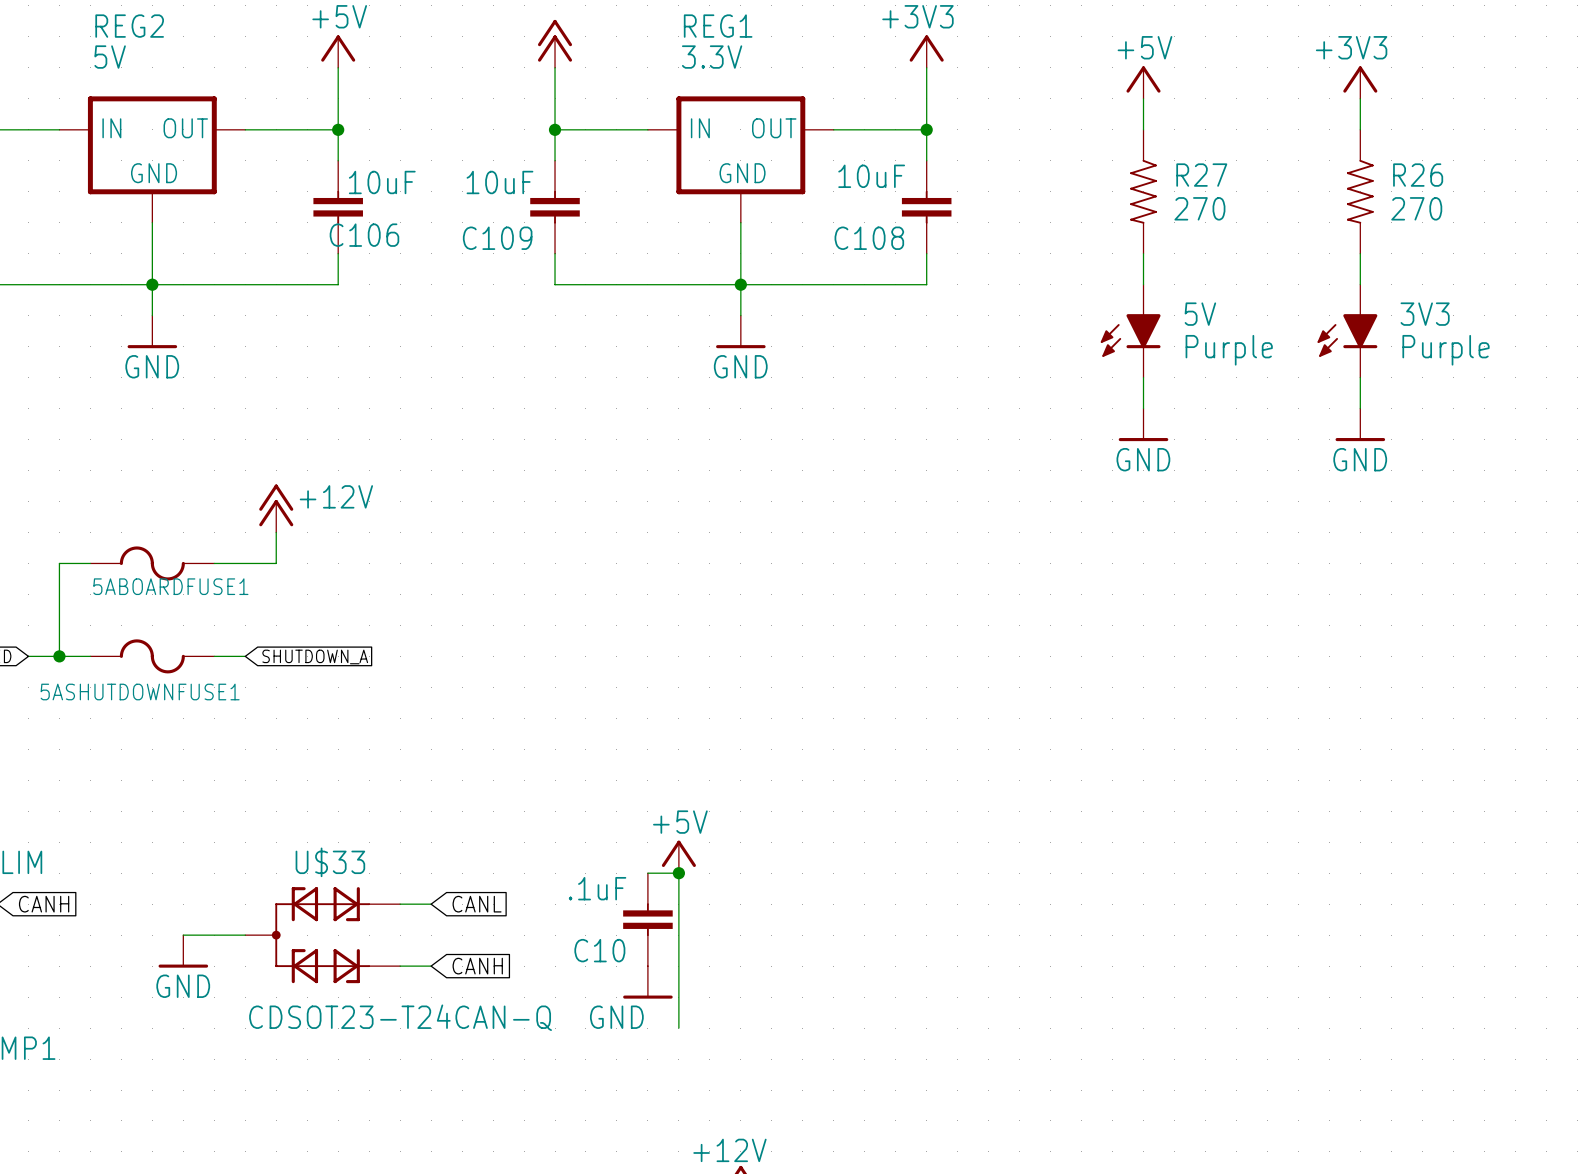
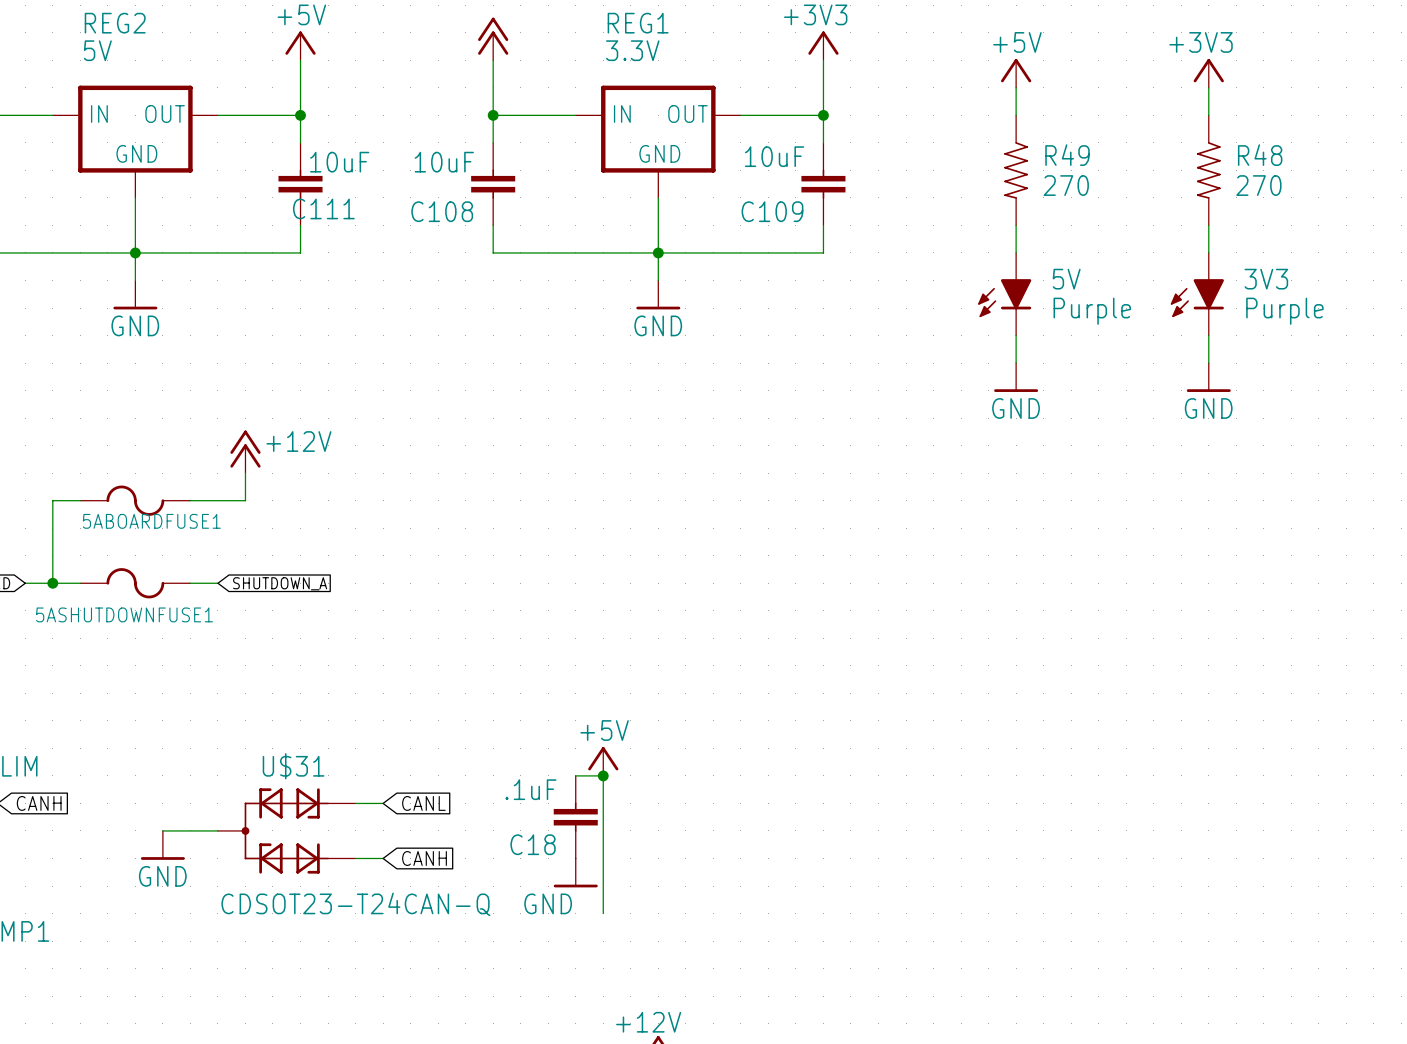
R27 name: R27 (1201, 175) -> R49 (1067, 155)
R26 name: R26 (1418, 175) -> R48 (1260, 155)
C106 name: C106 (364, 235) -> C111 (323, 208)
C109 name: C109 (497, 238) -> C108 (442, 211)
C108 name: C108 (869, 238) -> C109 (772, 211)
U$33 name: U$33 (330, 862) -> U$31 (293, 766)
C10 name: C10 (599, 950) -> C18 (533, 844)

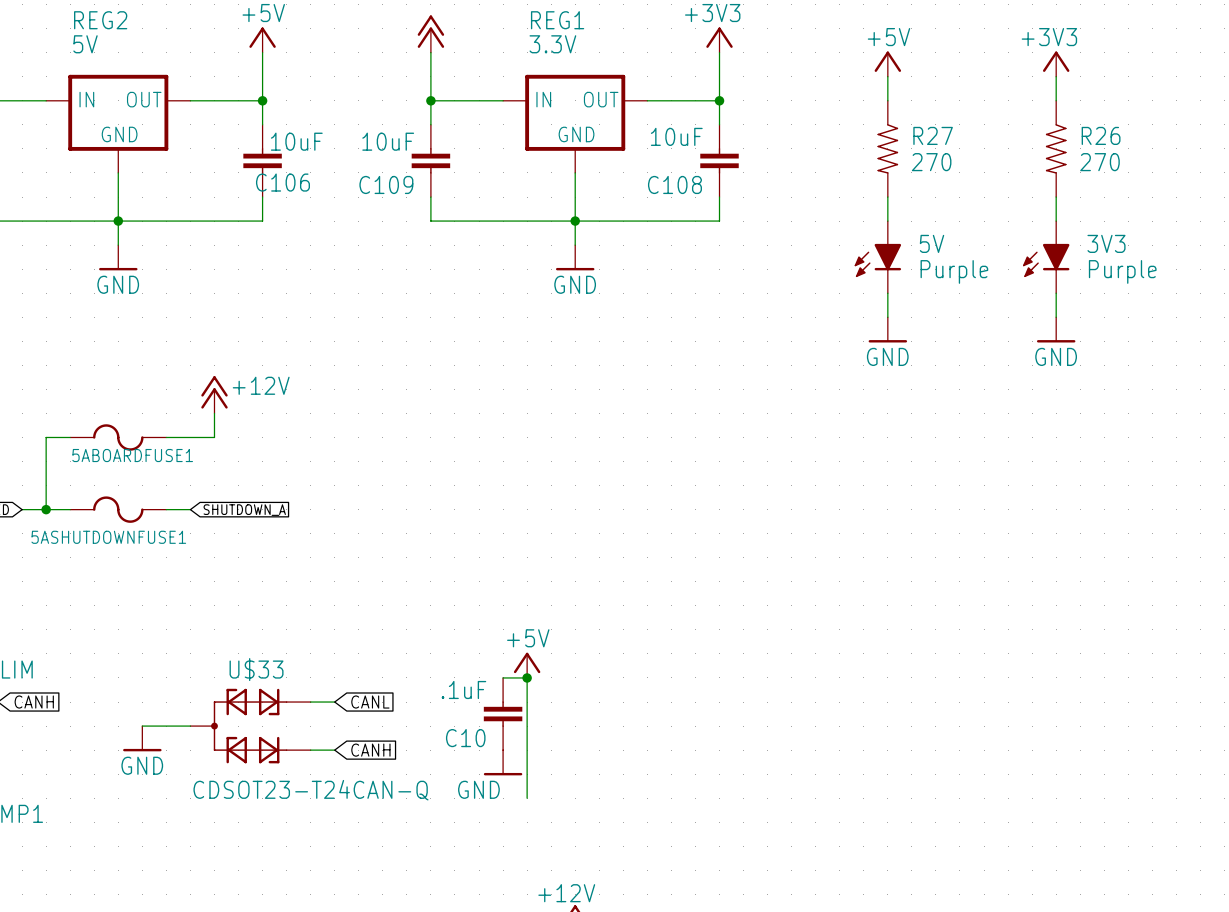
R49 name: R49 (1067, 155) -> R27 (933, 135)
R48 name: R48 (1260, 155) -> R26 (1101, 135)
C111 name: C111 (323, 208) -> C106 (282, 182)
C108 name: C108 (442, 211) -> C109 (386, 184)
C109 name: C109 (772, 211) -> C108 (674, 184)
U$31 name: U$31 (293, 766) -> U$33 (256, 669)
C18 name: C18 (533, 844) -> C10 (465, 738)

